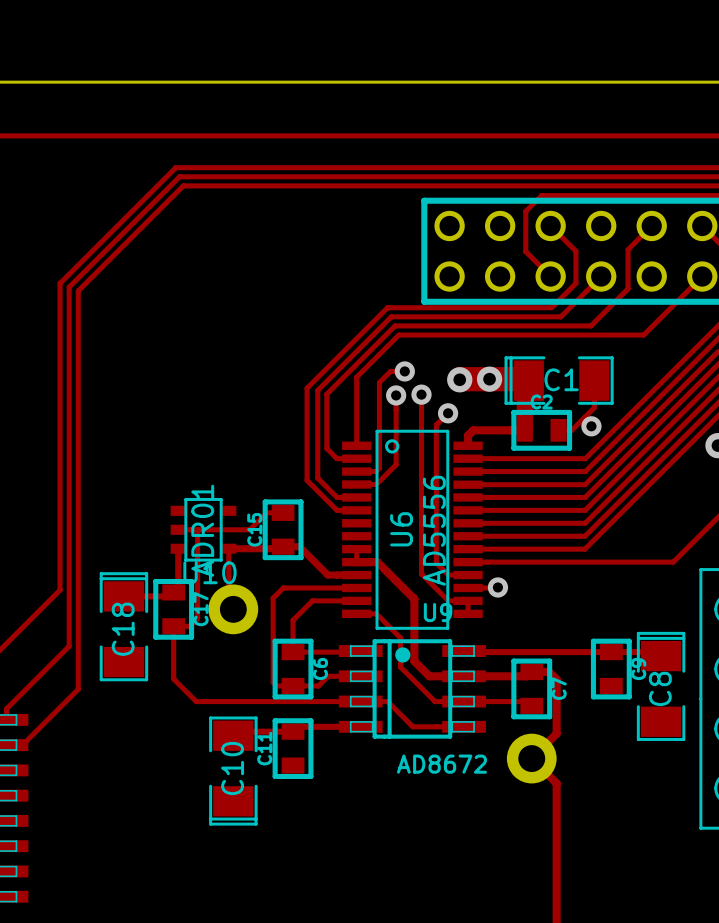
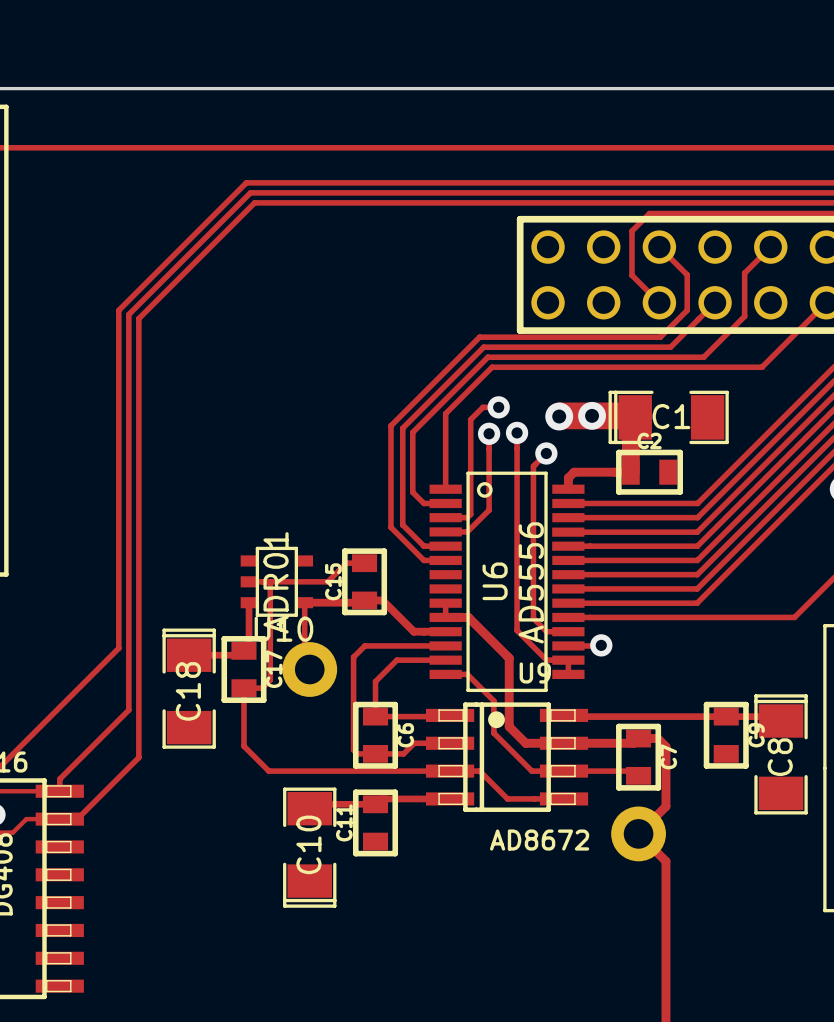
track: (594, 380) (594, 407) (571, 430) (558, 430) -> none
via: (591, 426) -> none

